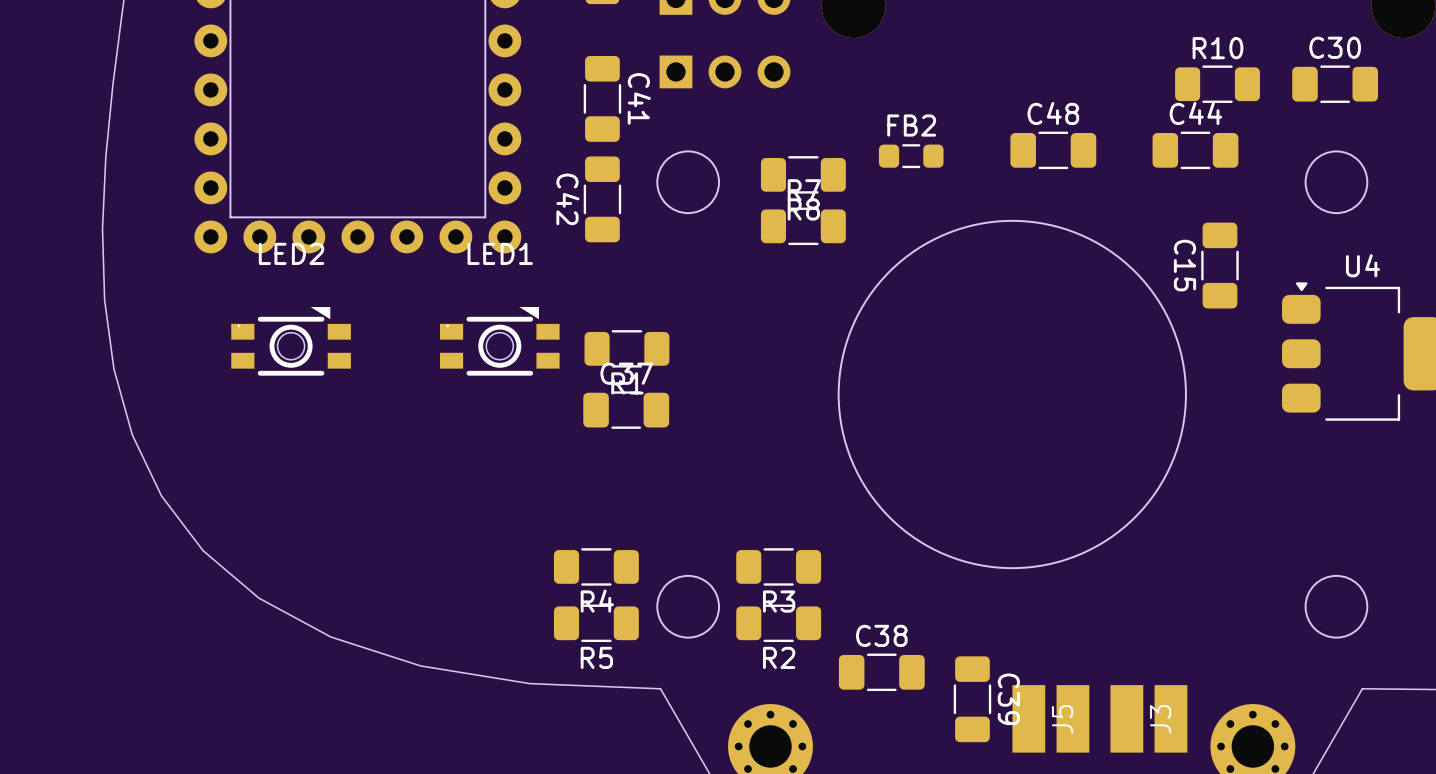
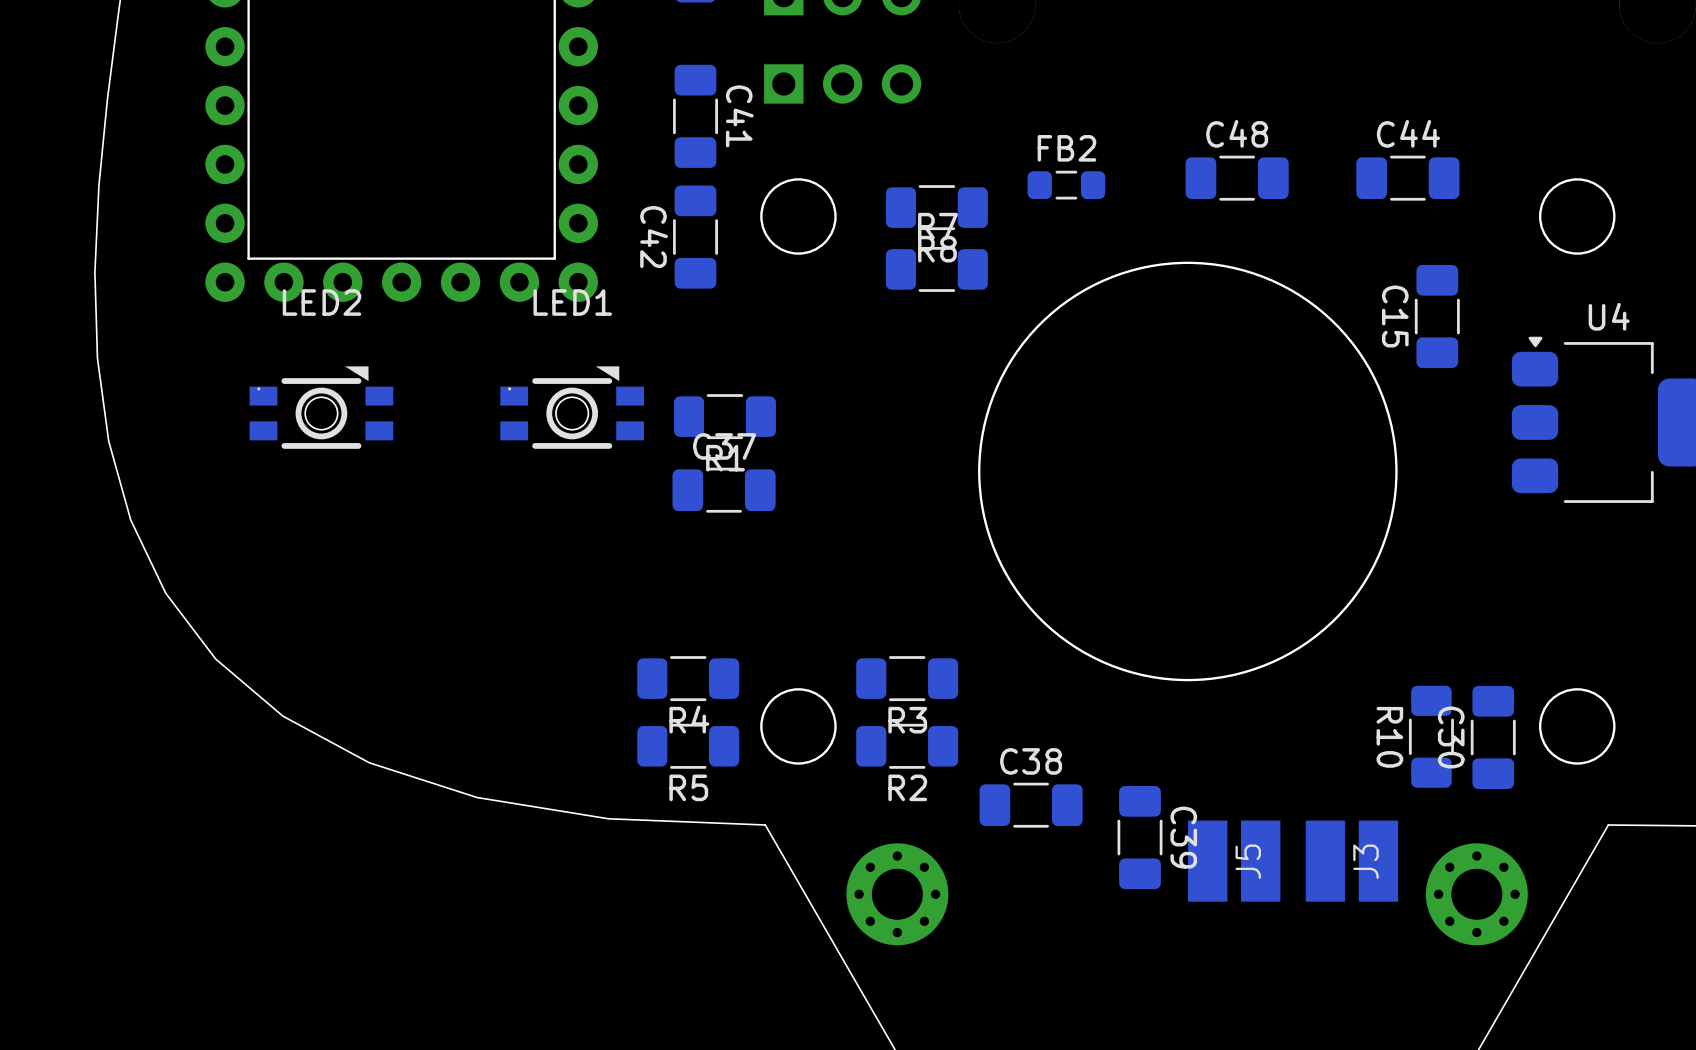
C30 name position: C30 (1335, 47) -> C30 (1451, 737)
R10 name position: R10 (1217, 48) -> R10 (1389, 737)
R10 rotation: 0° (1217, 84) -> 90° clockwise (1431, 736)
R10 position: (1217, 84) -> (1431, 736)
C30 rotation: 0° (1335, 84) -> 90° clockwise (1493, 737)
C30 position: (1335, 84) -> (1493, 737)

